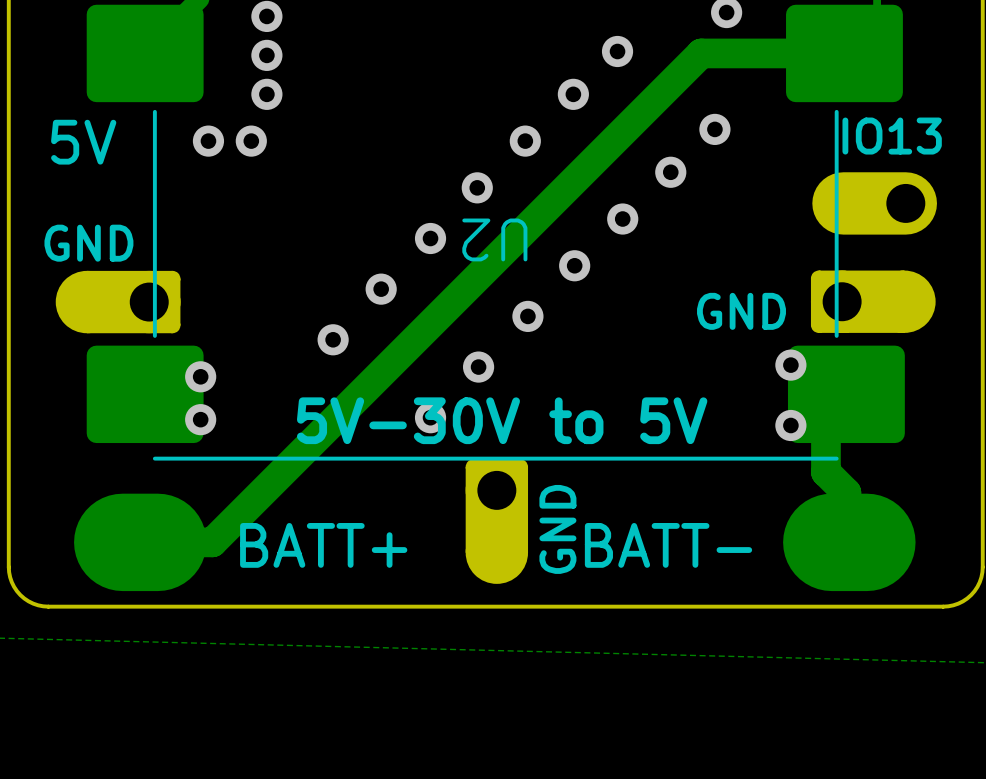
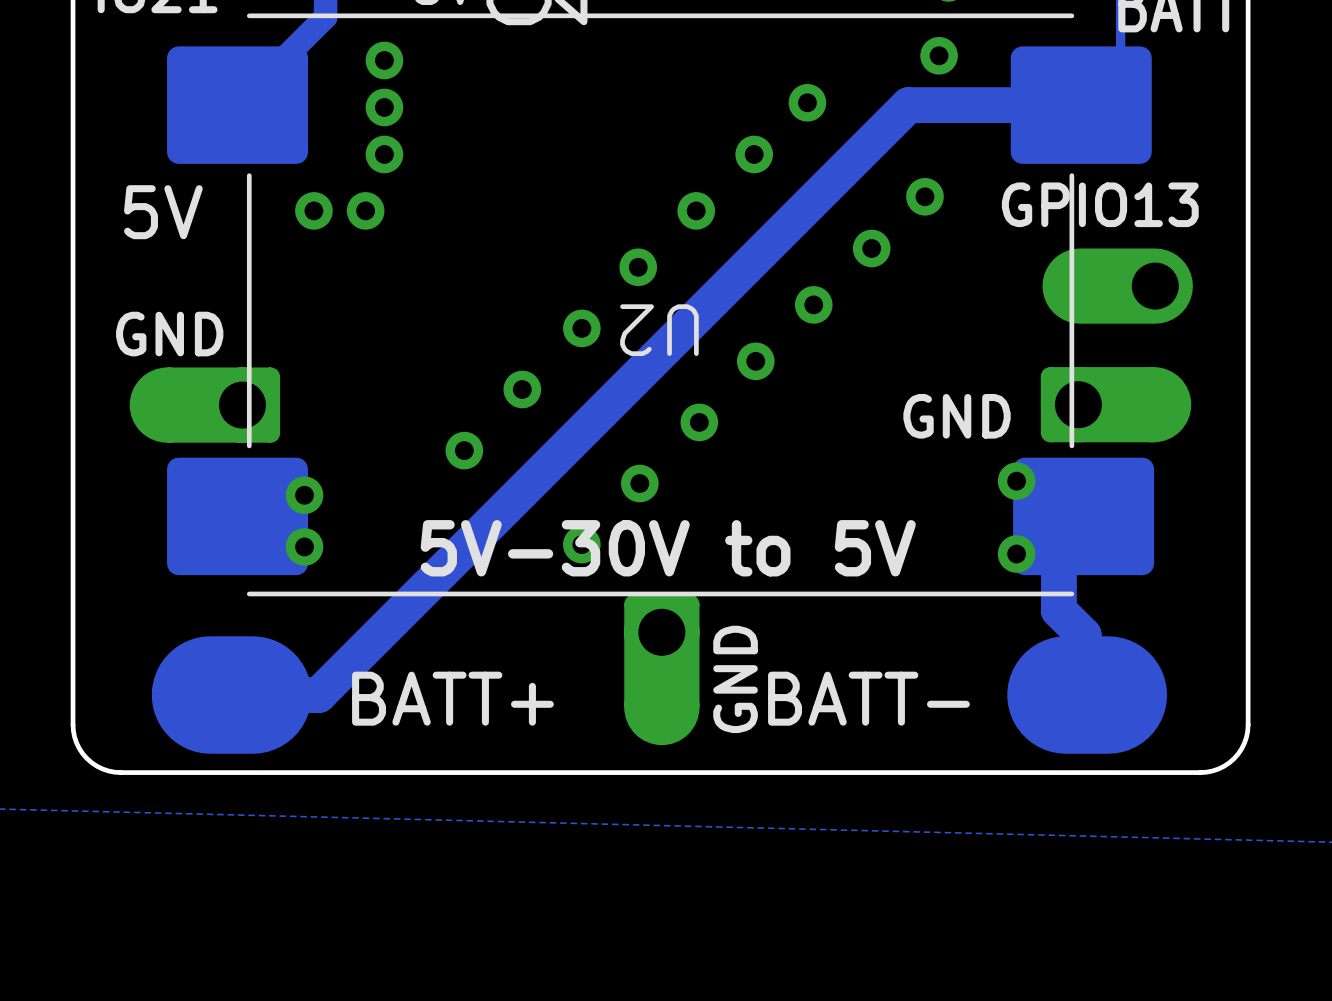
part value: IO13 (892, 136) -> GPIO13 (1100, 204)

